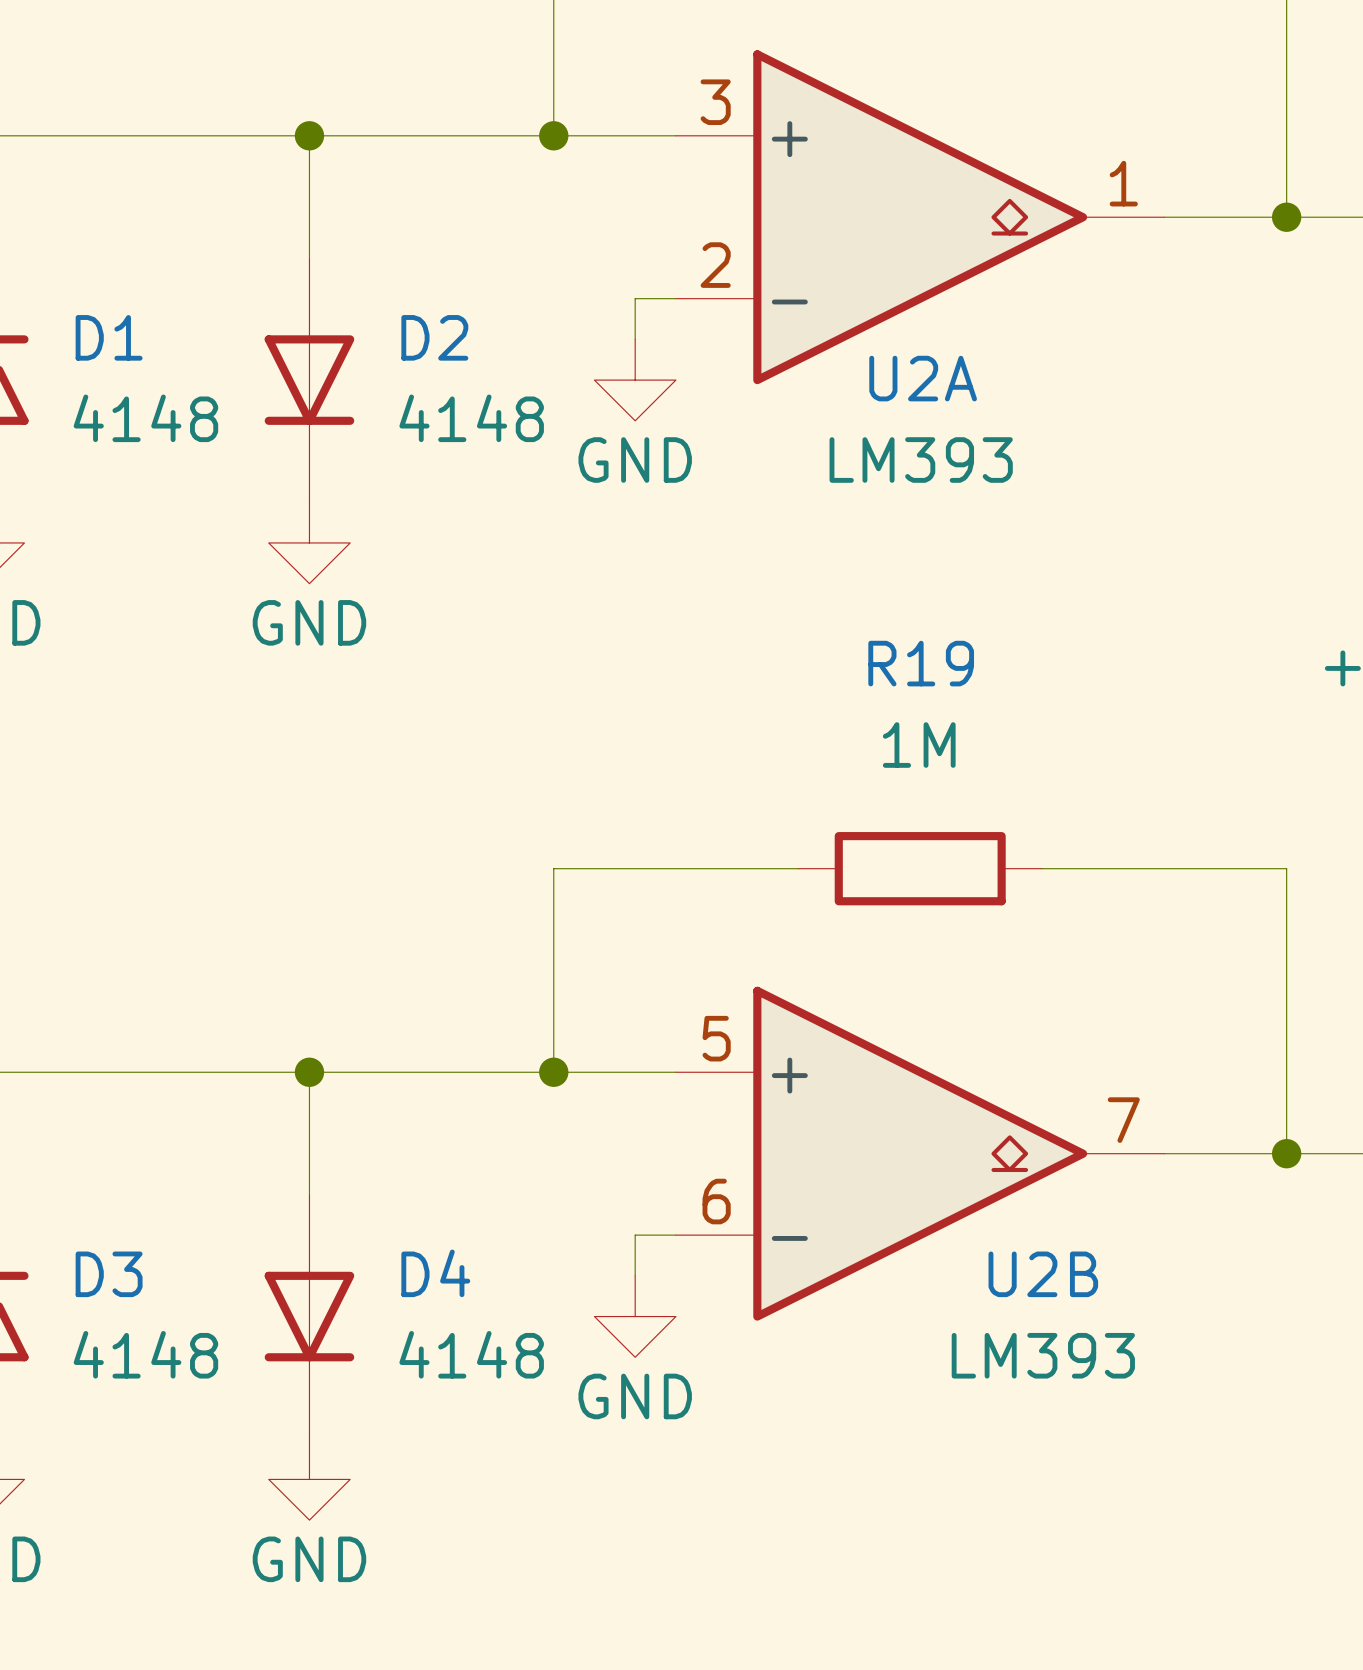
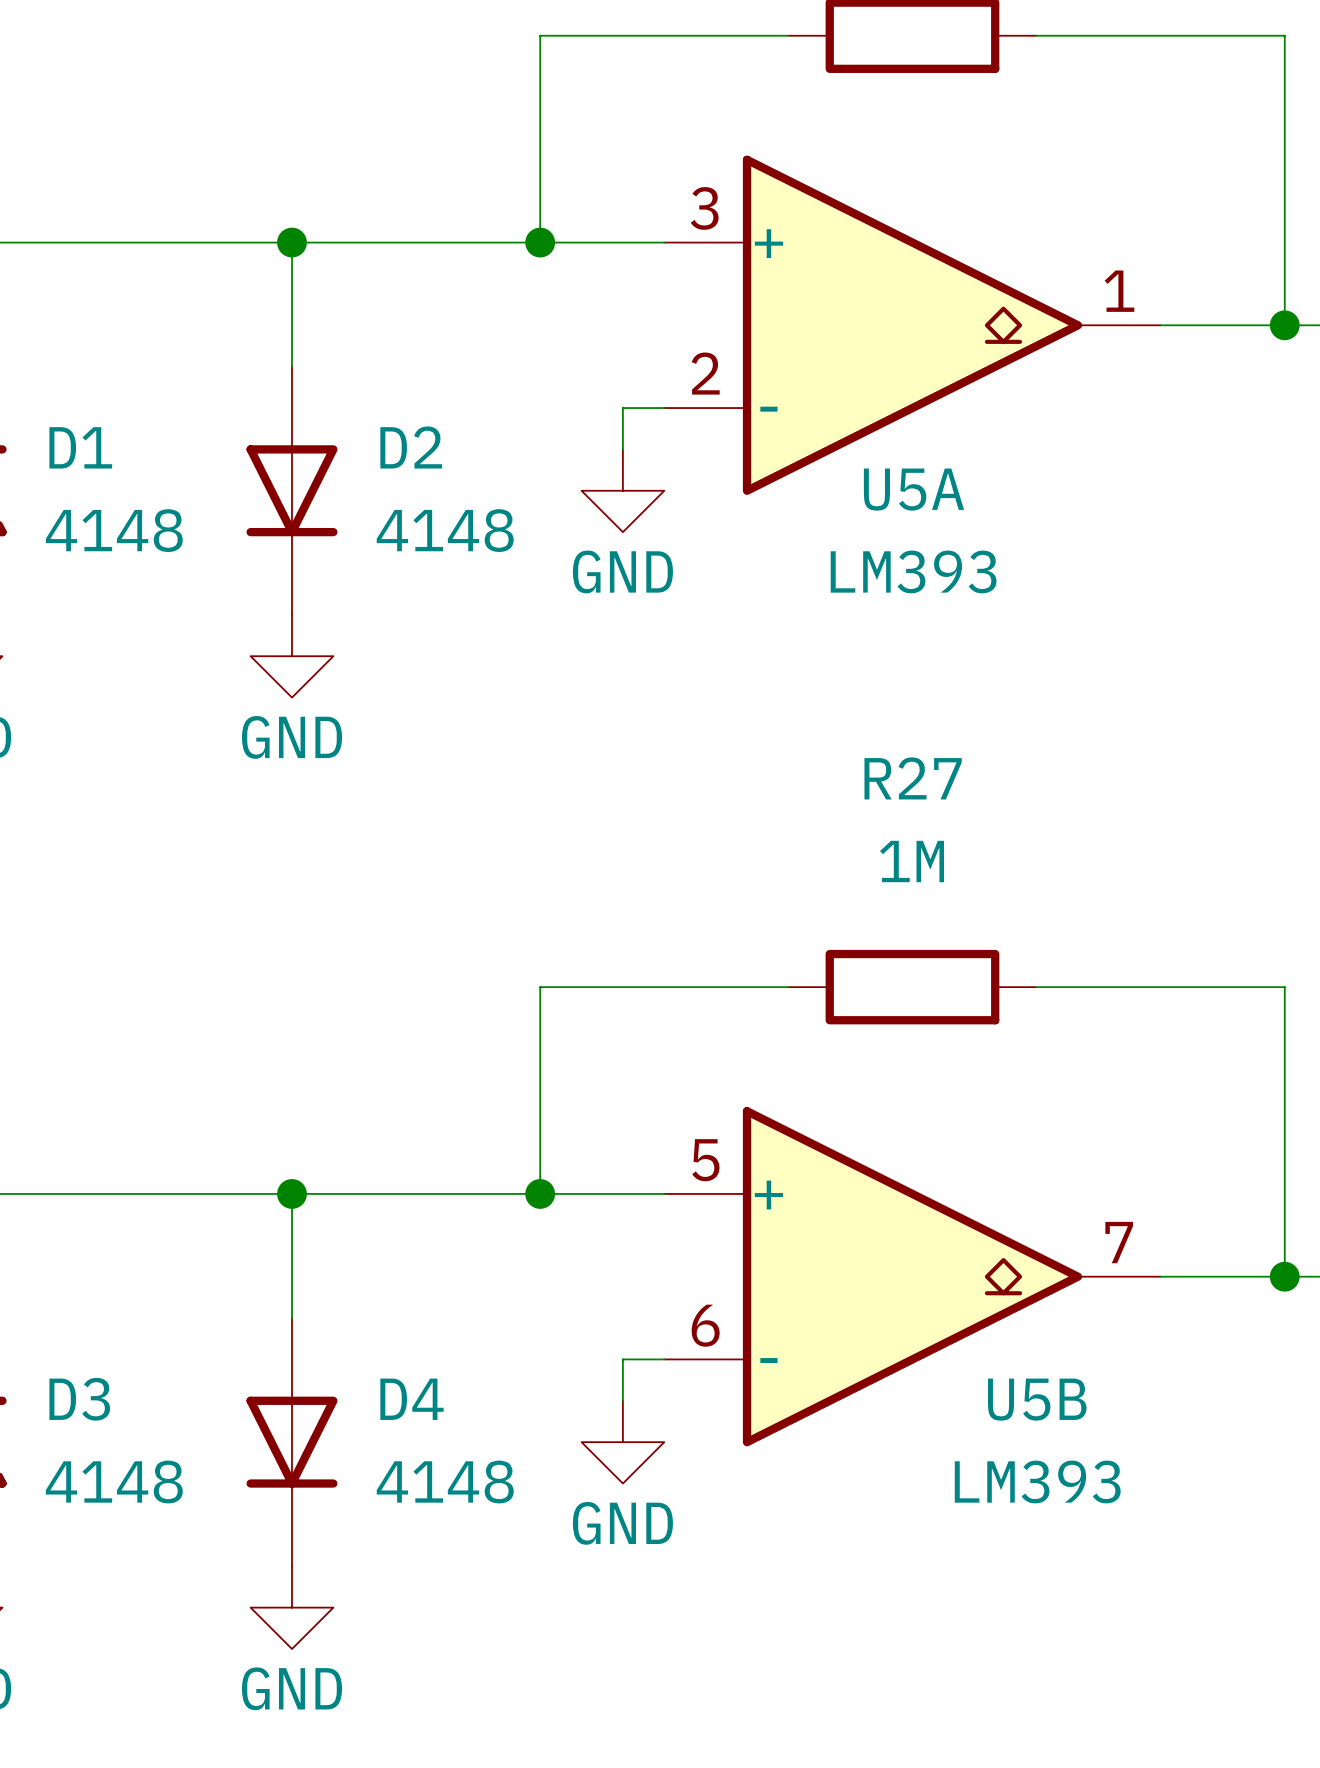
U2A name: U2A (923, 378) -> U5A (913, 489)
R19 name: R19 (921, 663) -> R27 (913, 778)
U2B name: U2B (1043, 1274) -> U5B (1037, 1399)

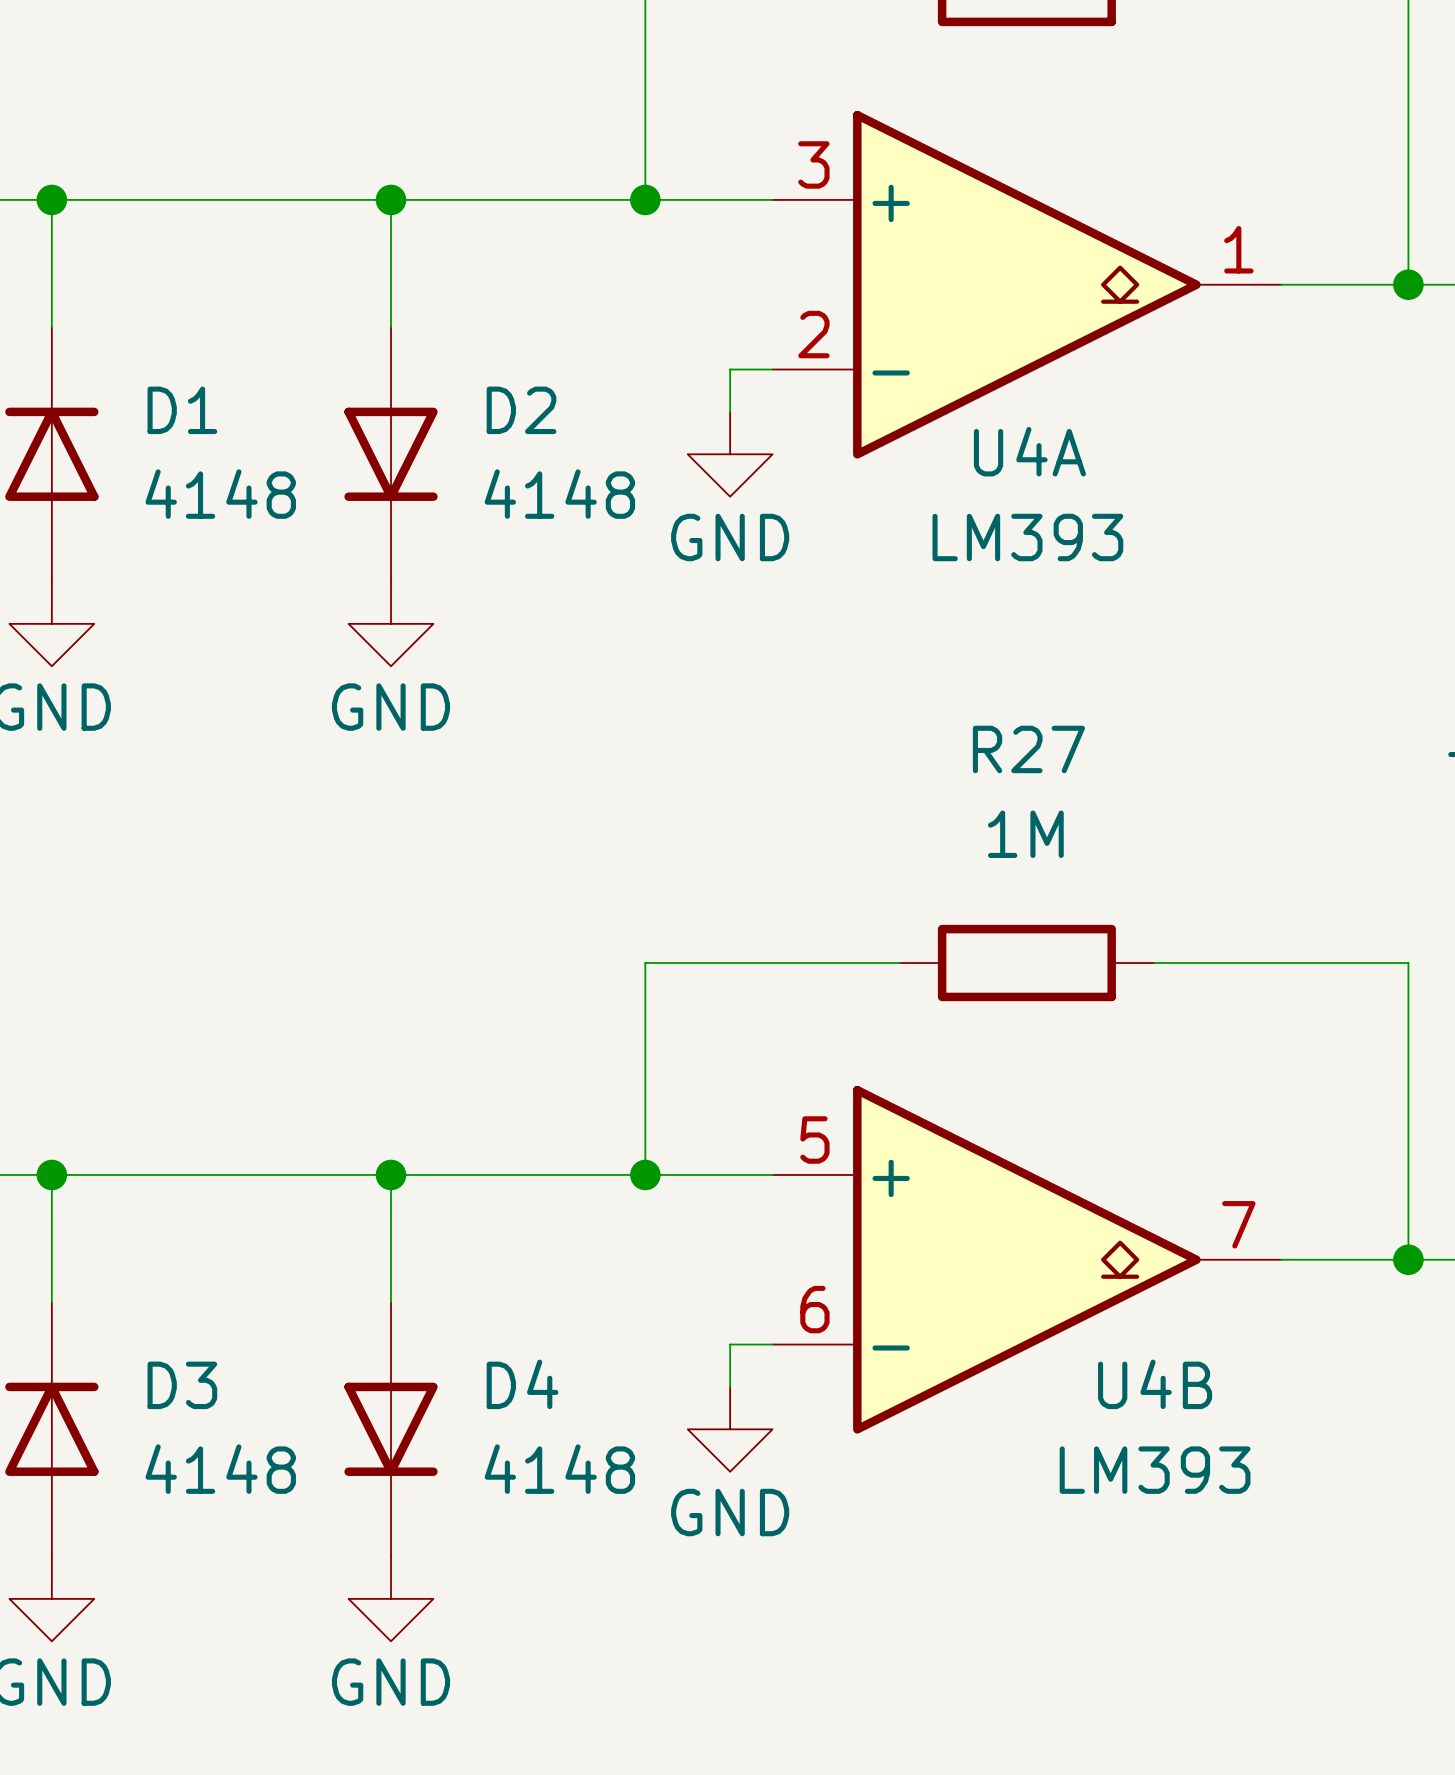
U5A name: U5A (913, 489) -> U4A (1029, 451)
U5B name: U5B (1037, 1399) -> U4B (1155, 1384)

